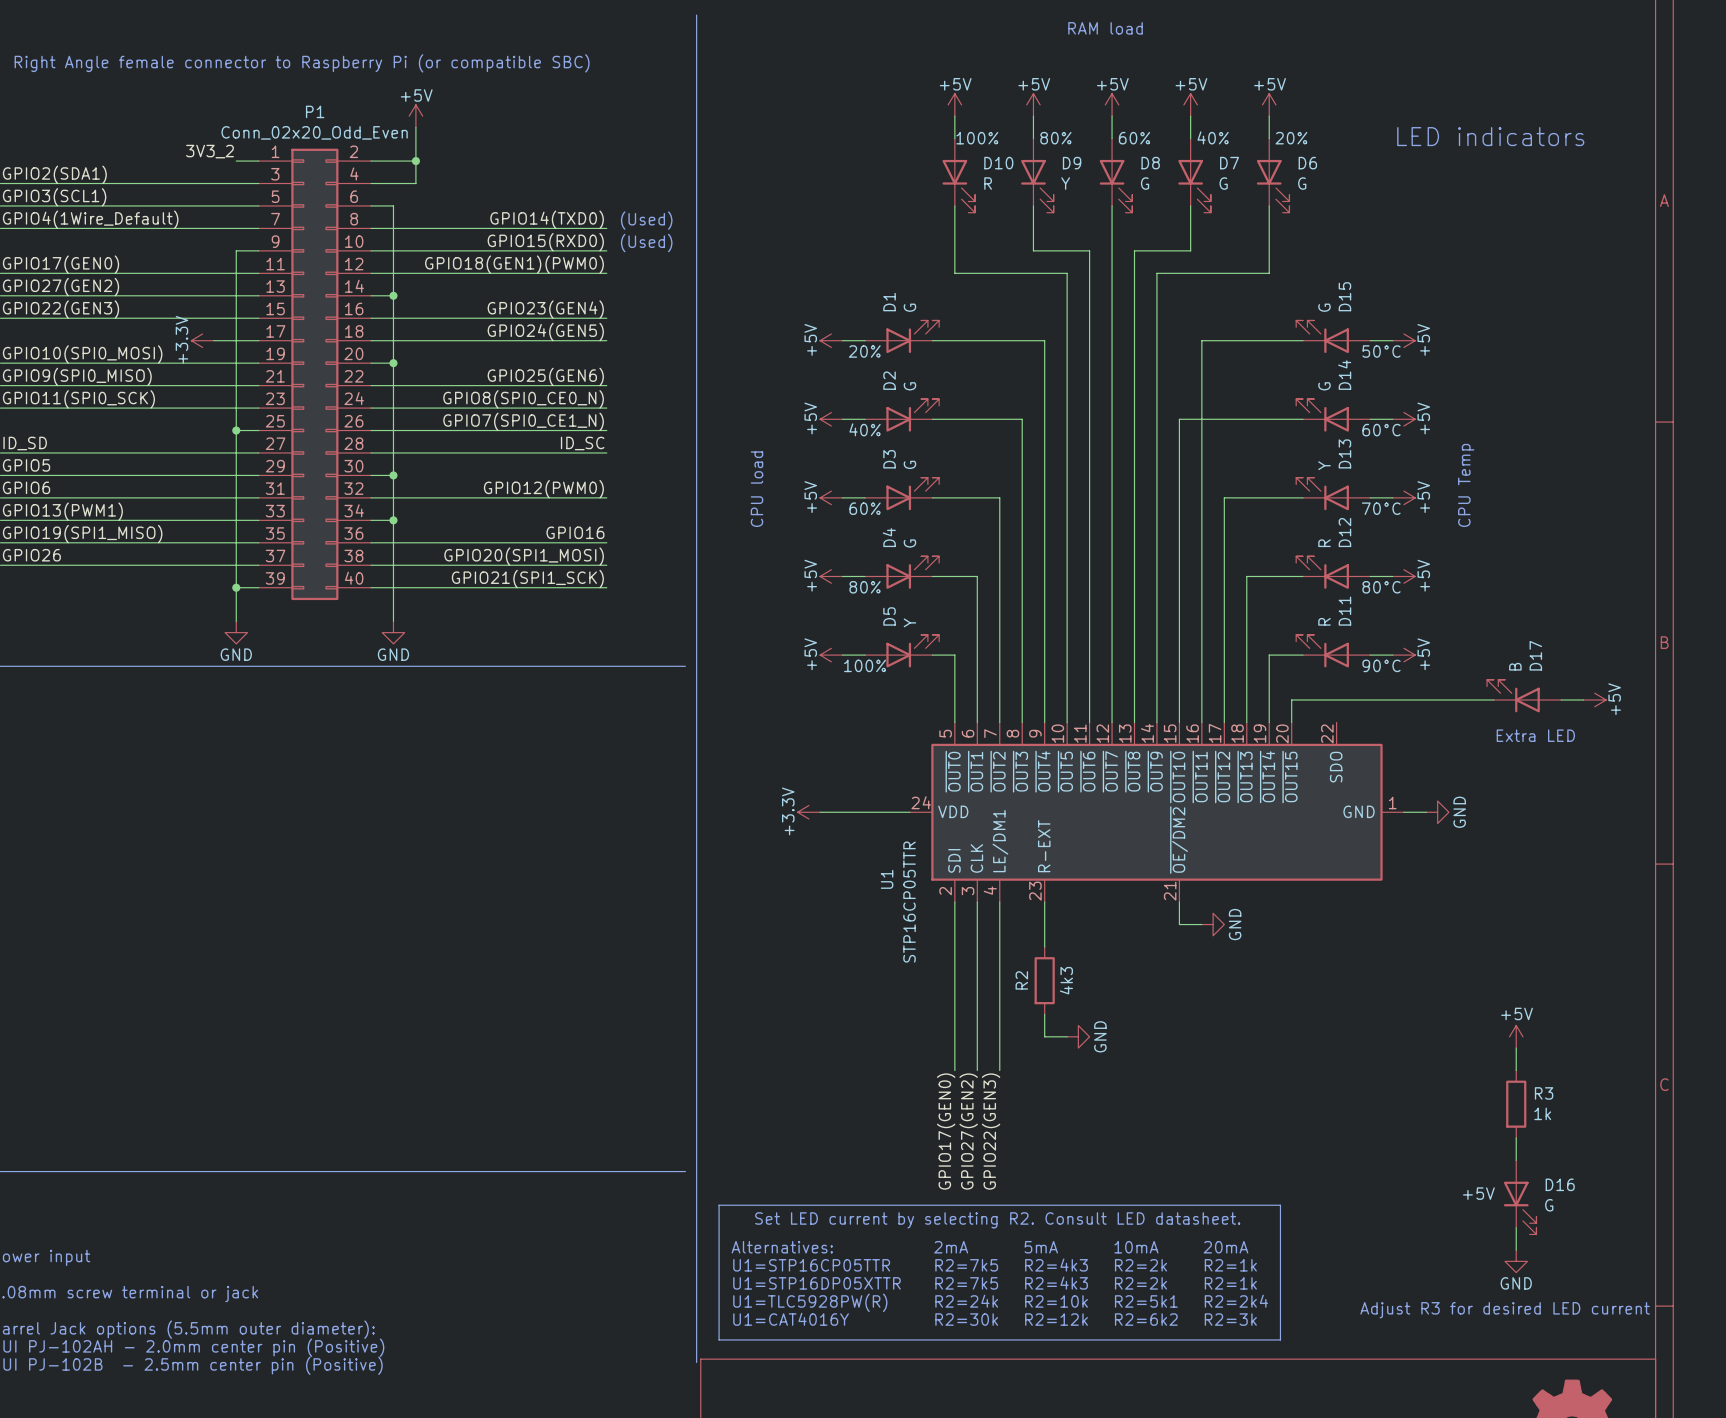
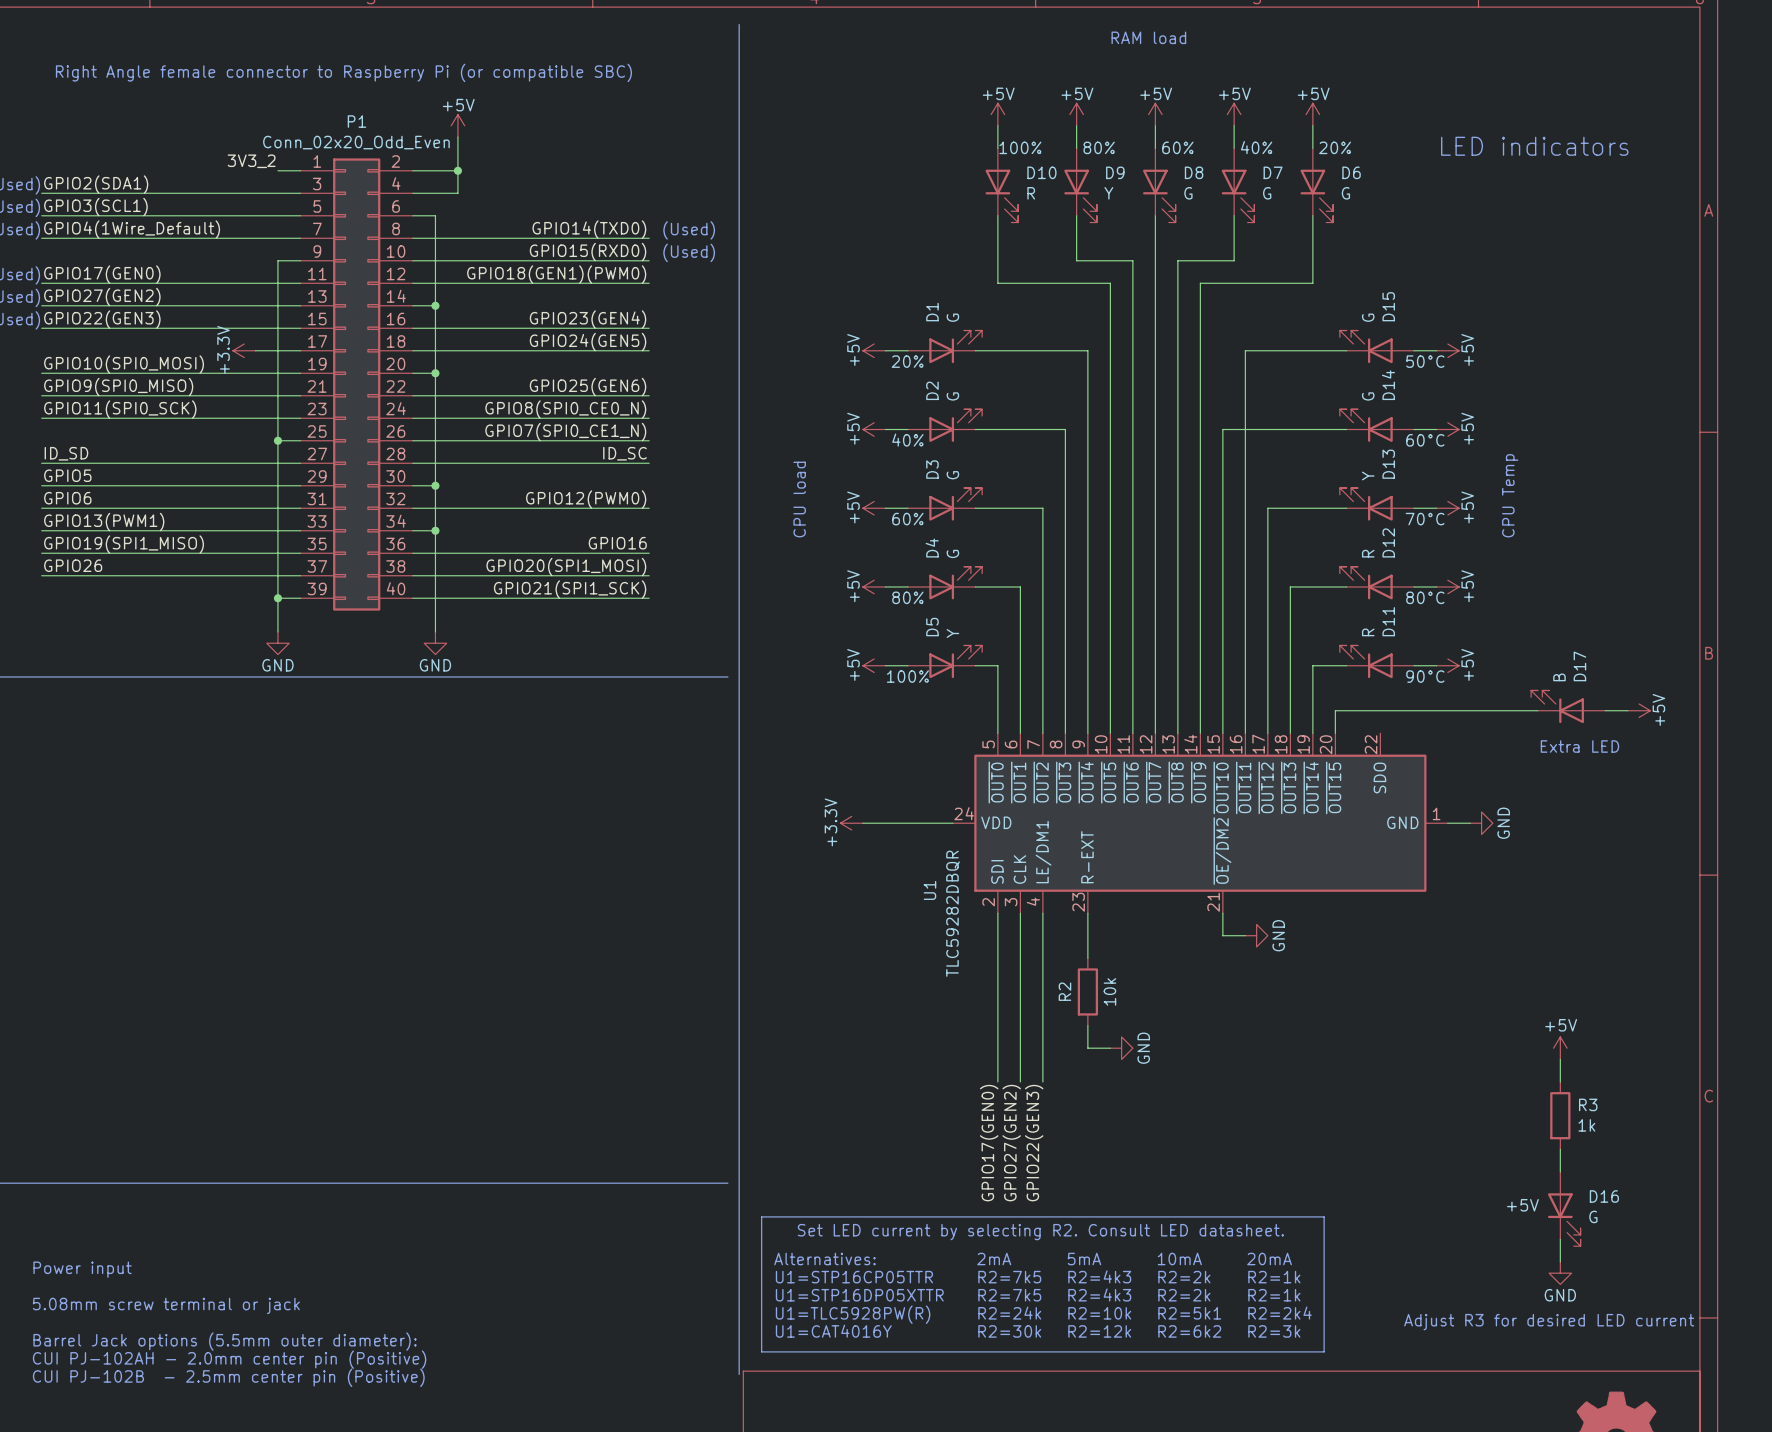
U1 value: STP16CP05TTR (909, 902) -> TLC59282DBQR (953, 913)
R2 value: 4k3 (1066, 980) -> 10k (1109, 991)

